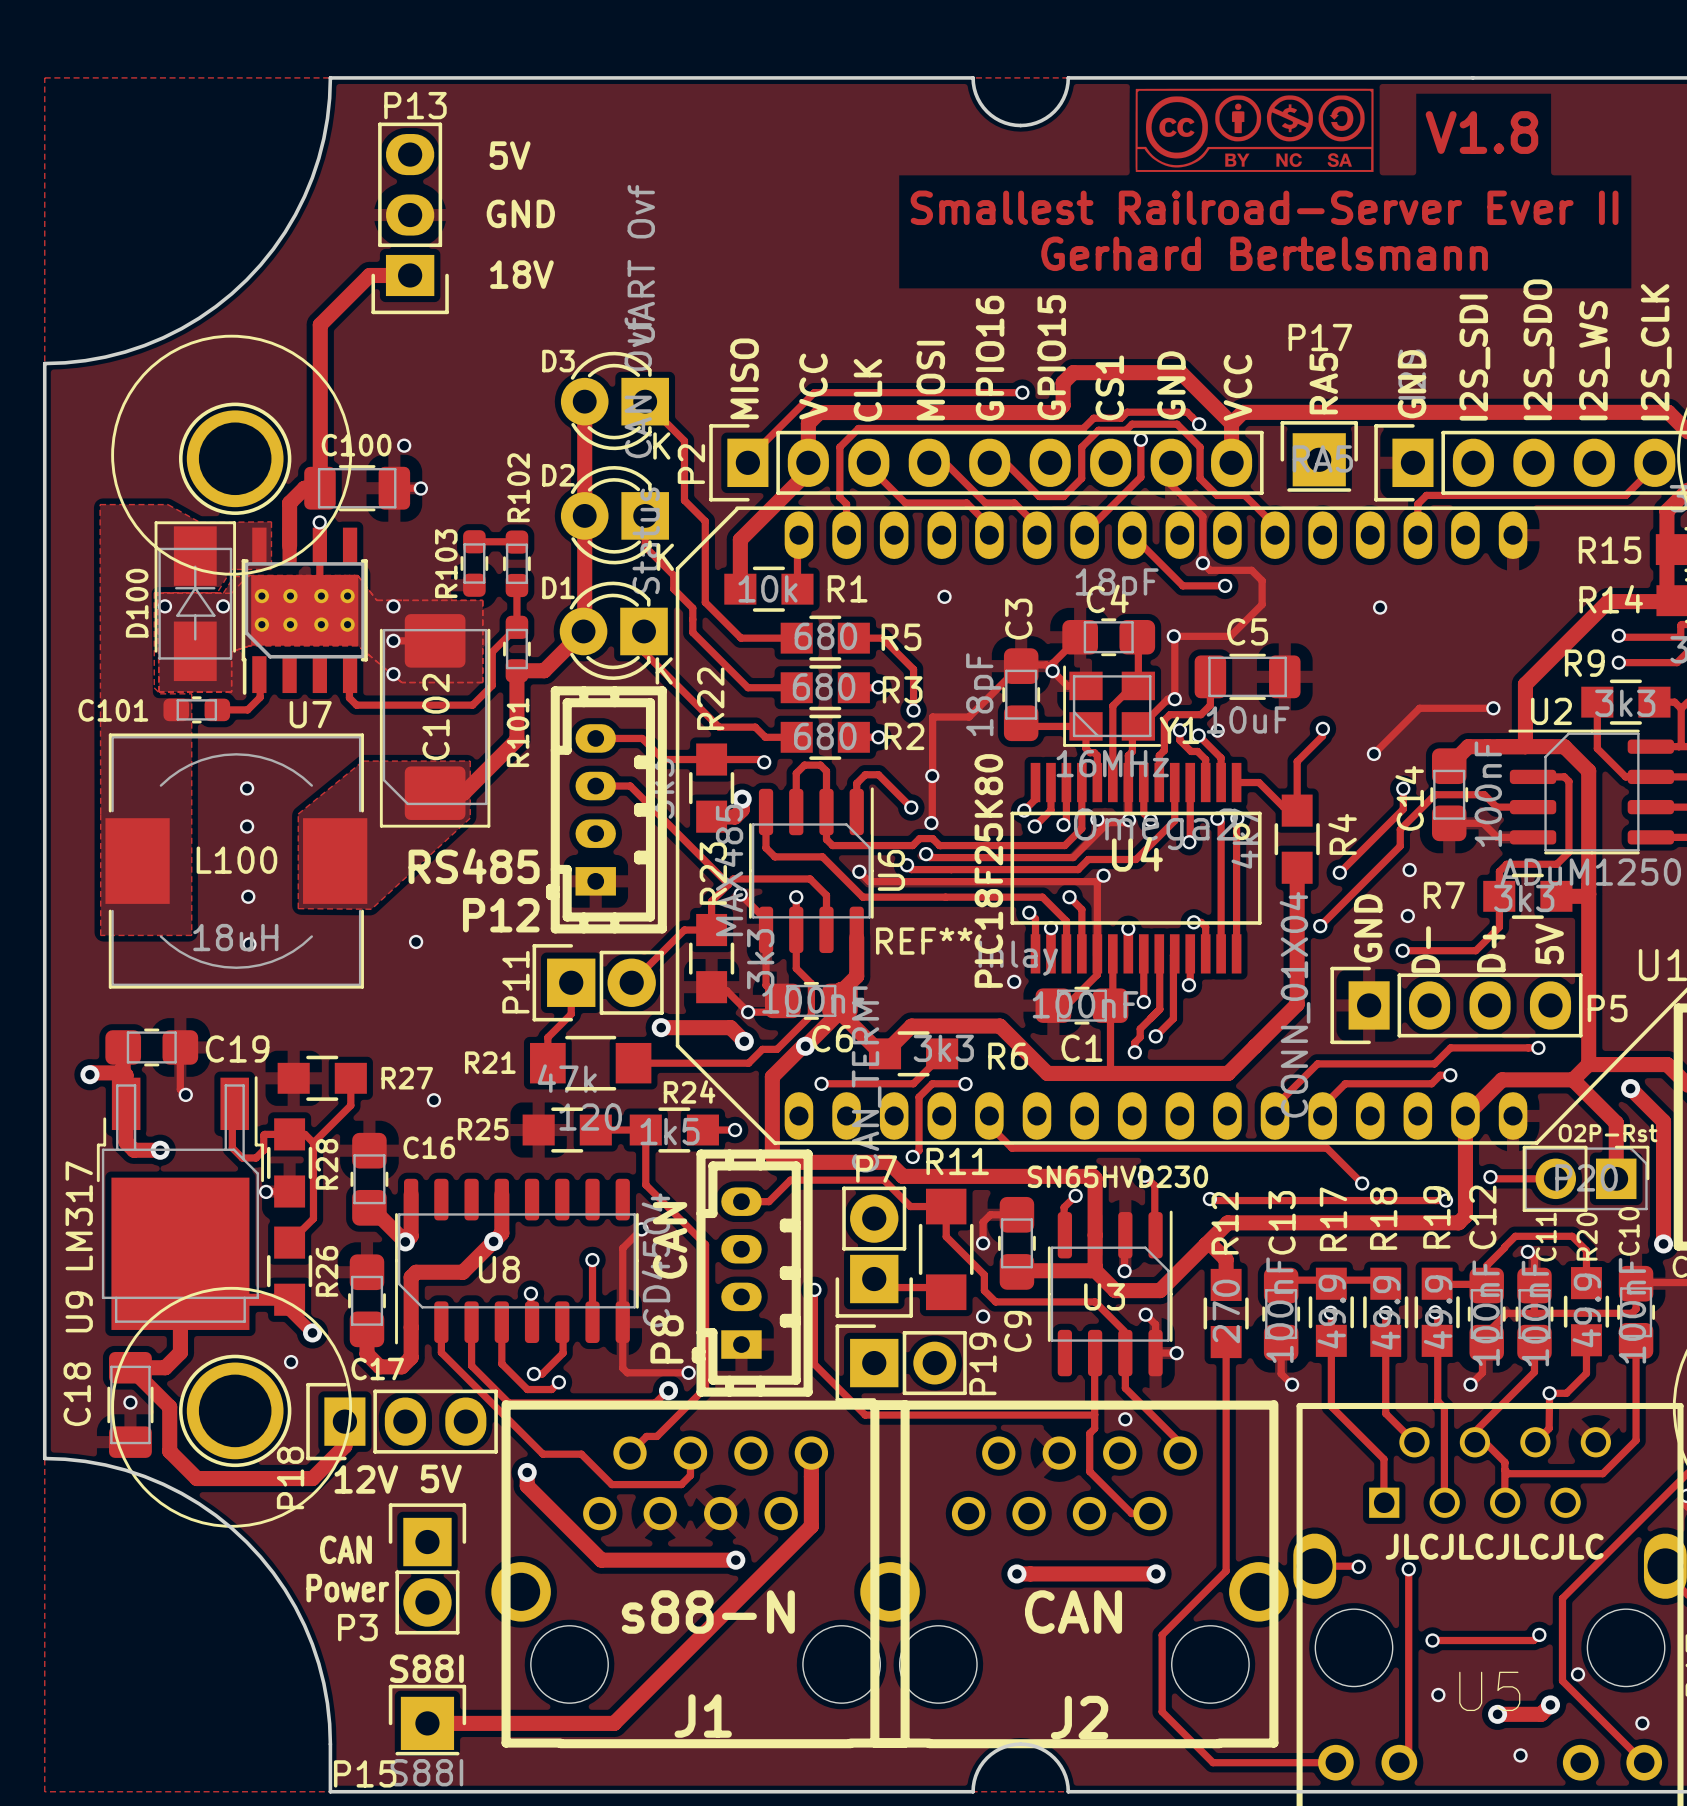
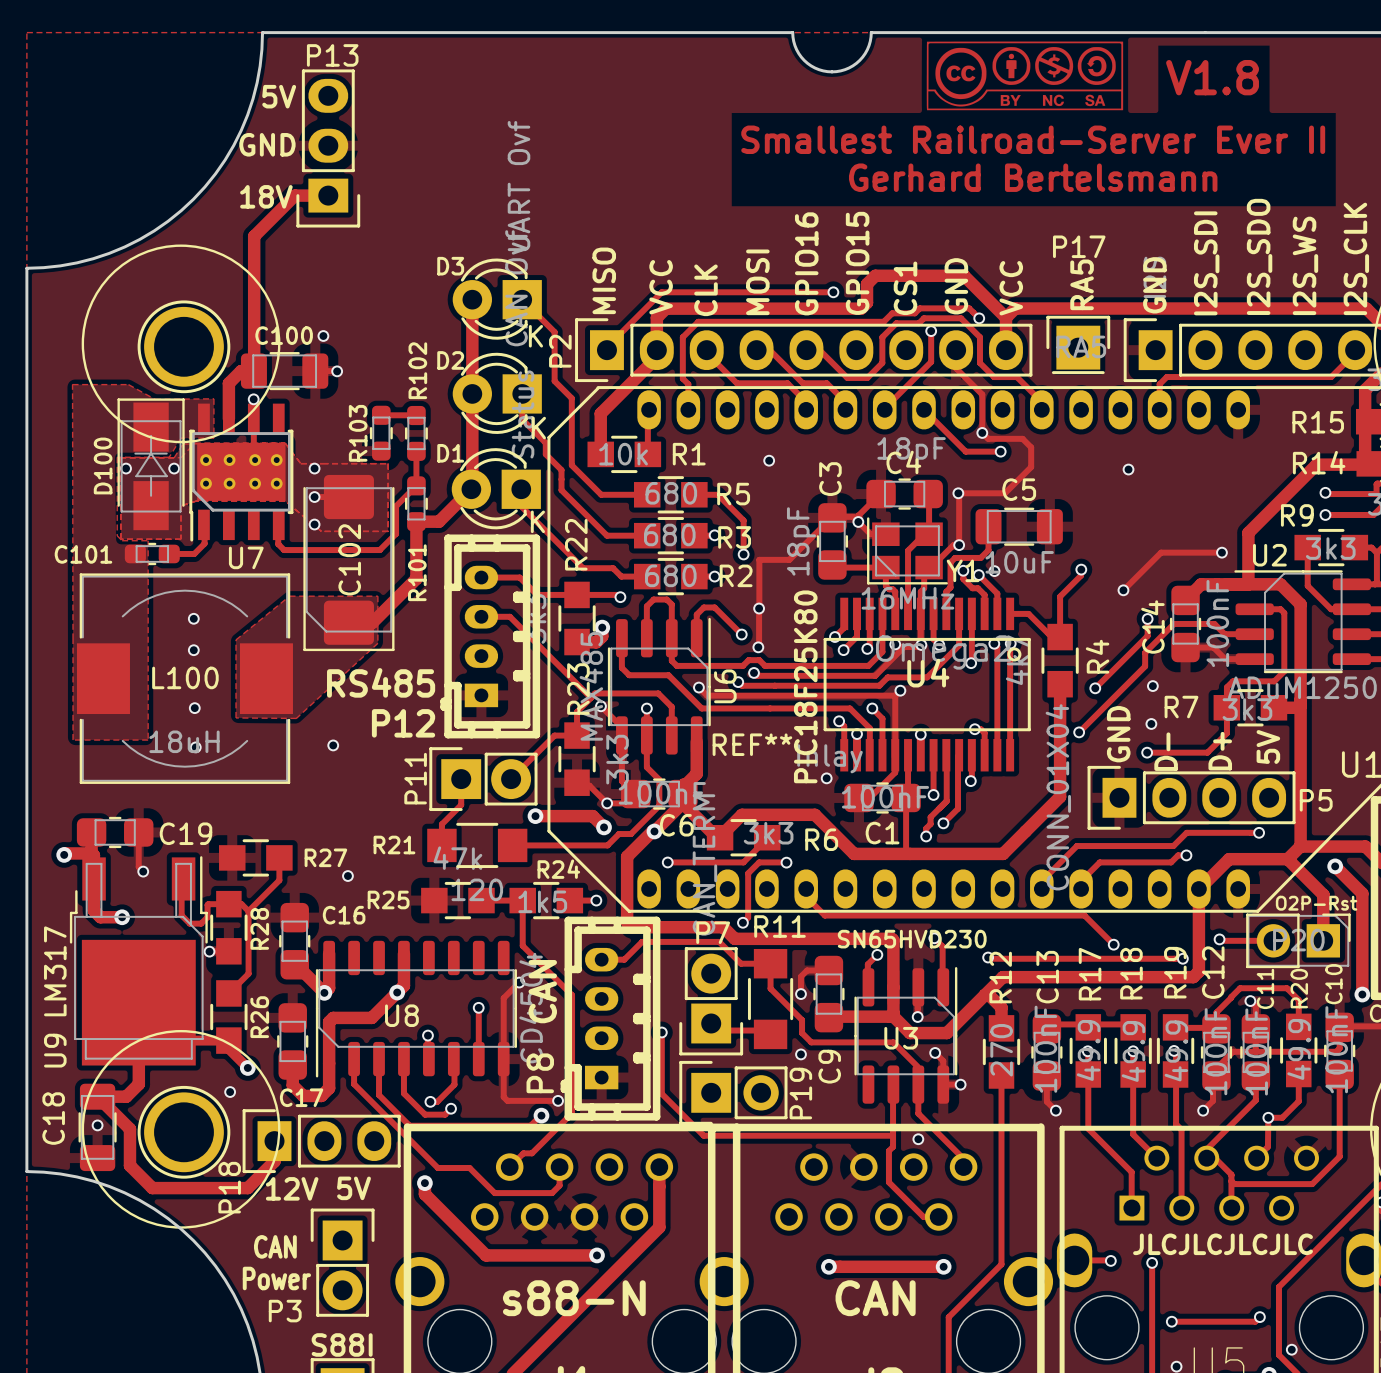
text position: 5V (510, 155) -> 5V (279, 96)
text position: GND (520, 213) -> GND (267, 144)
text position: 18V (521, 274) -> 18V (266, 196)

